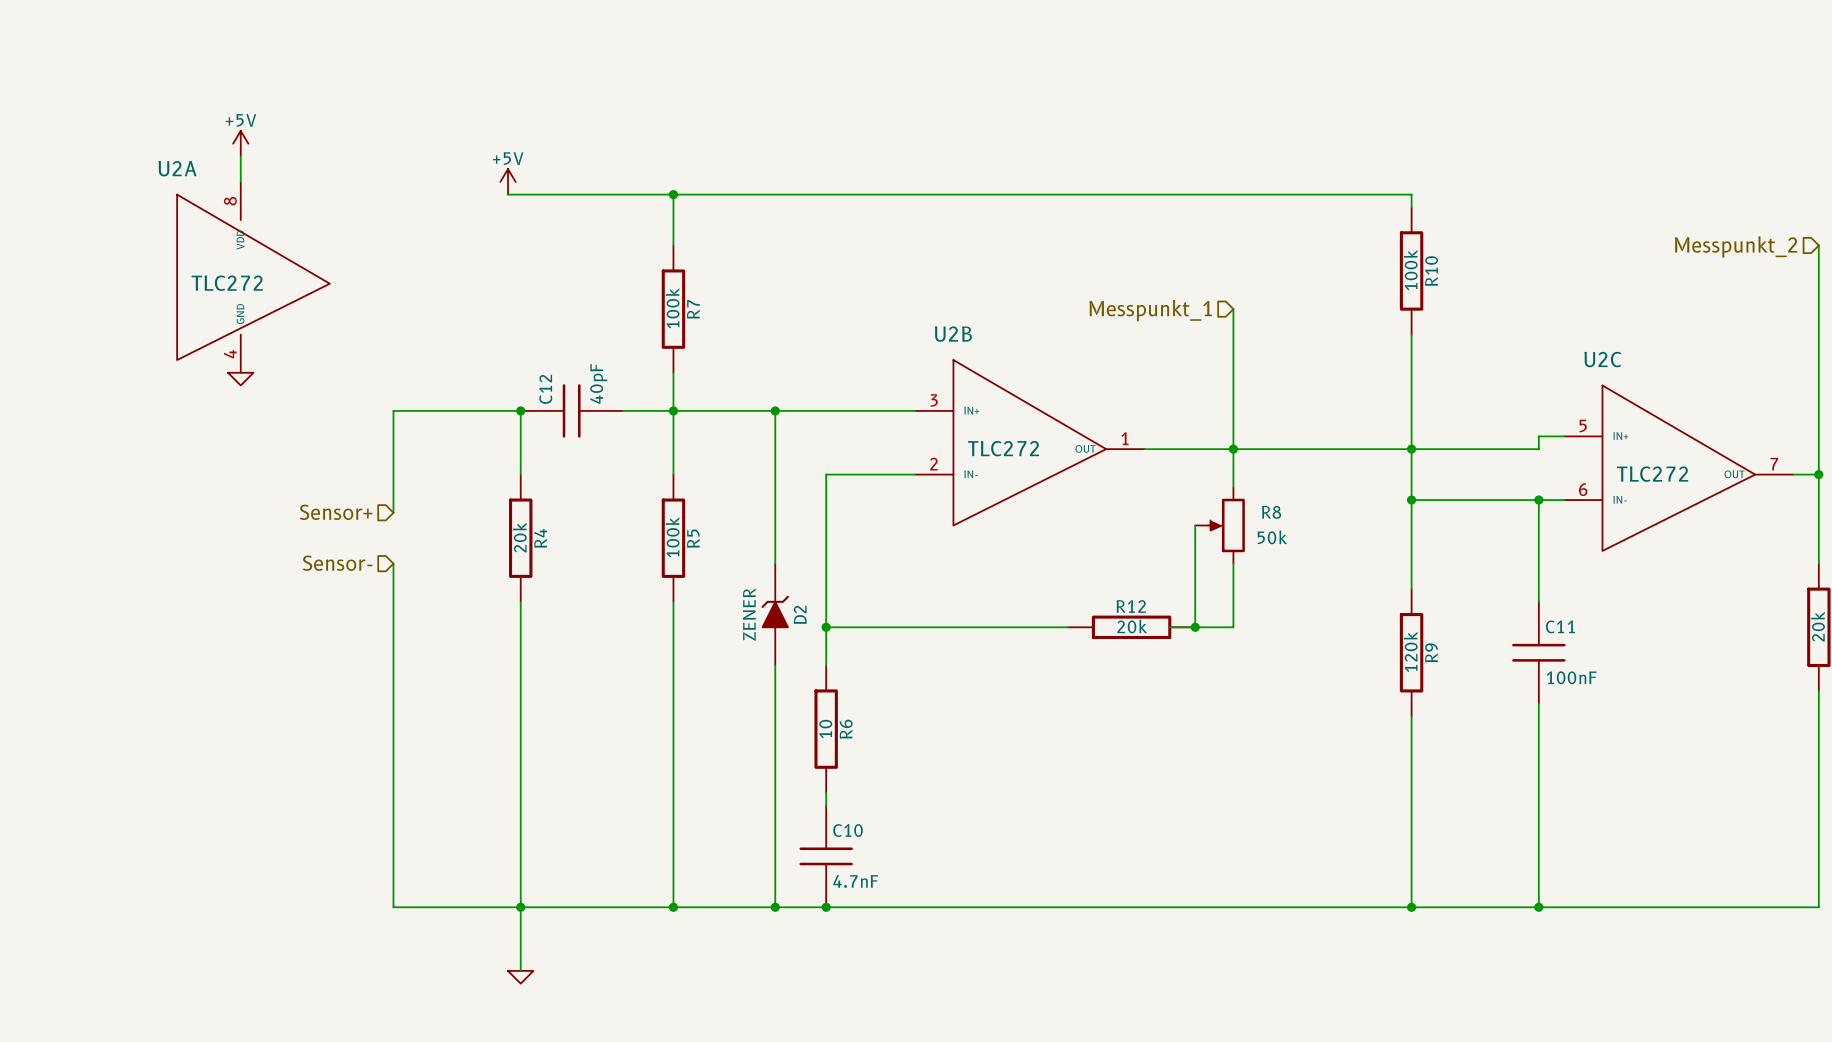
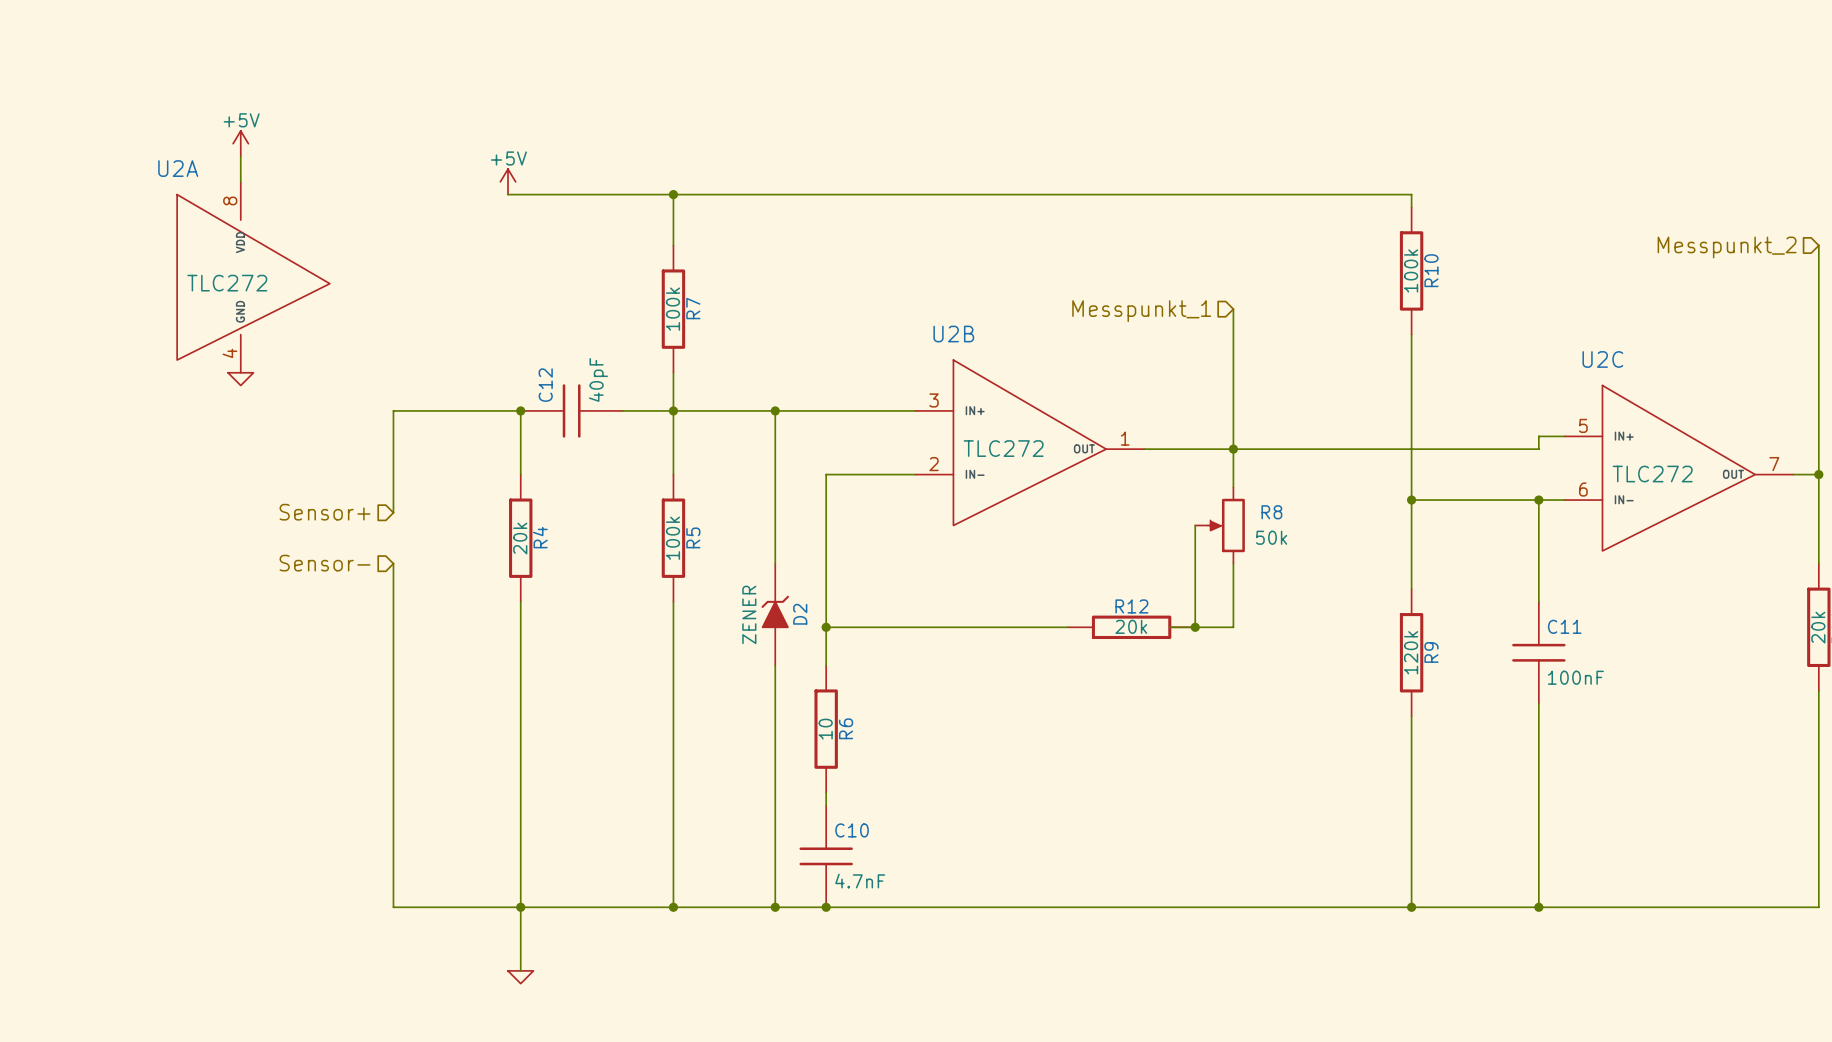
junction: (1411, 449) -> none

